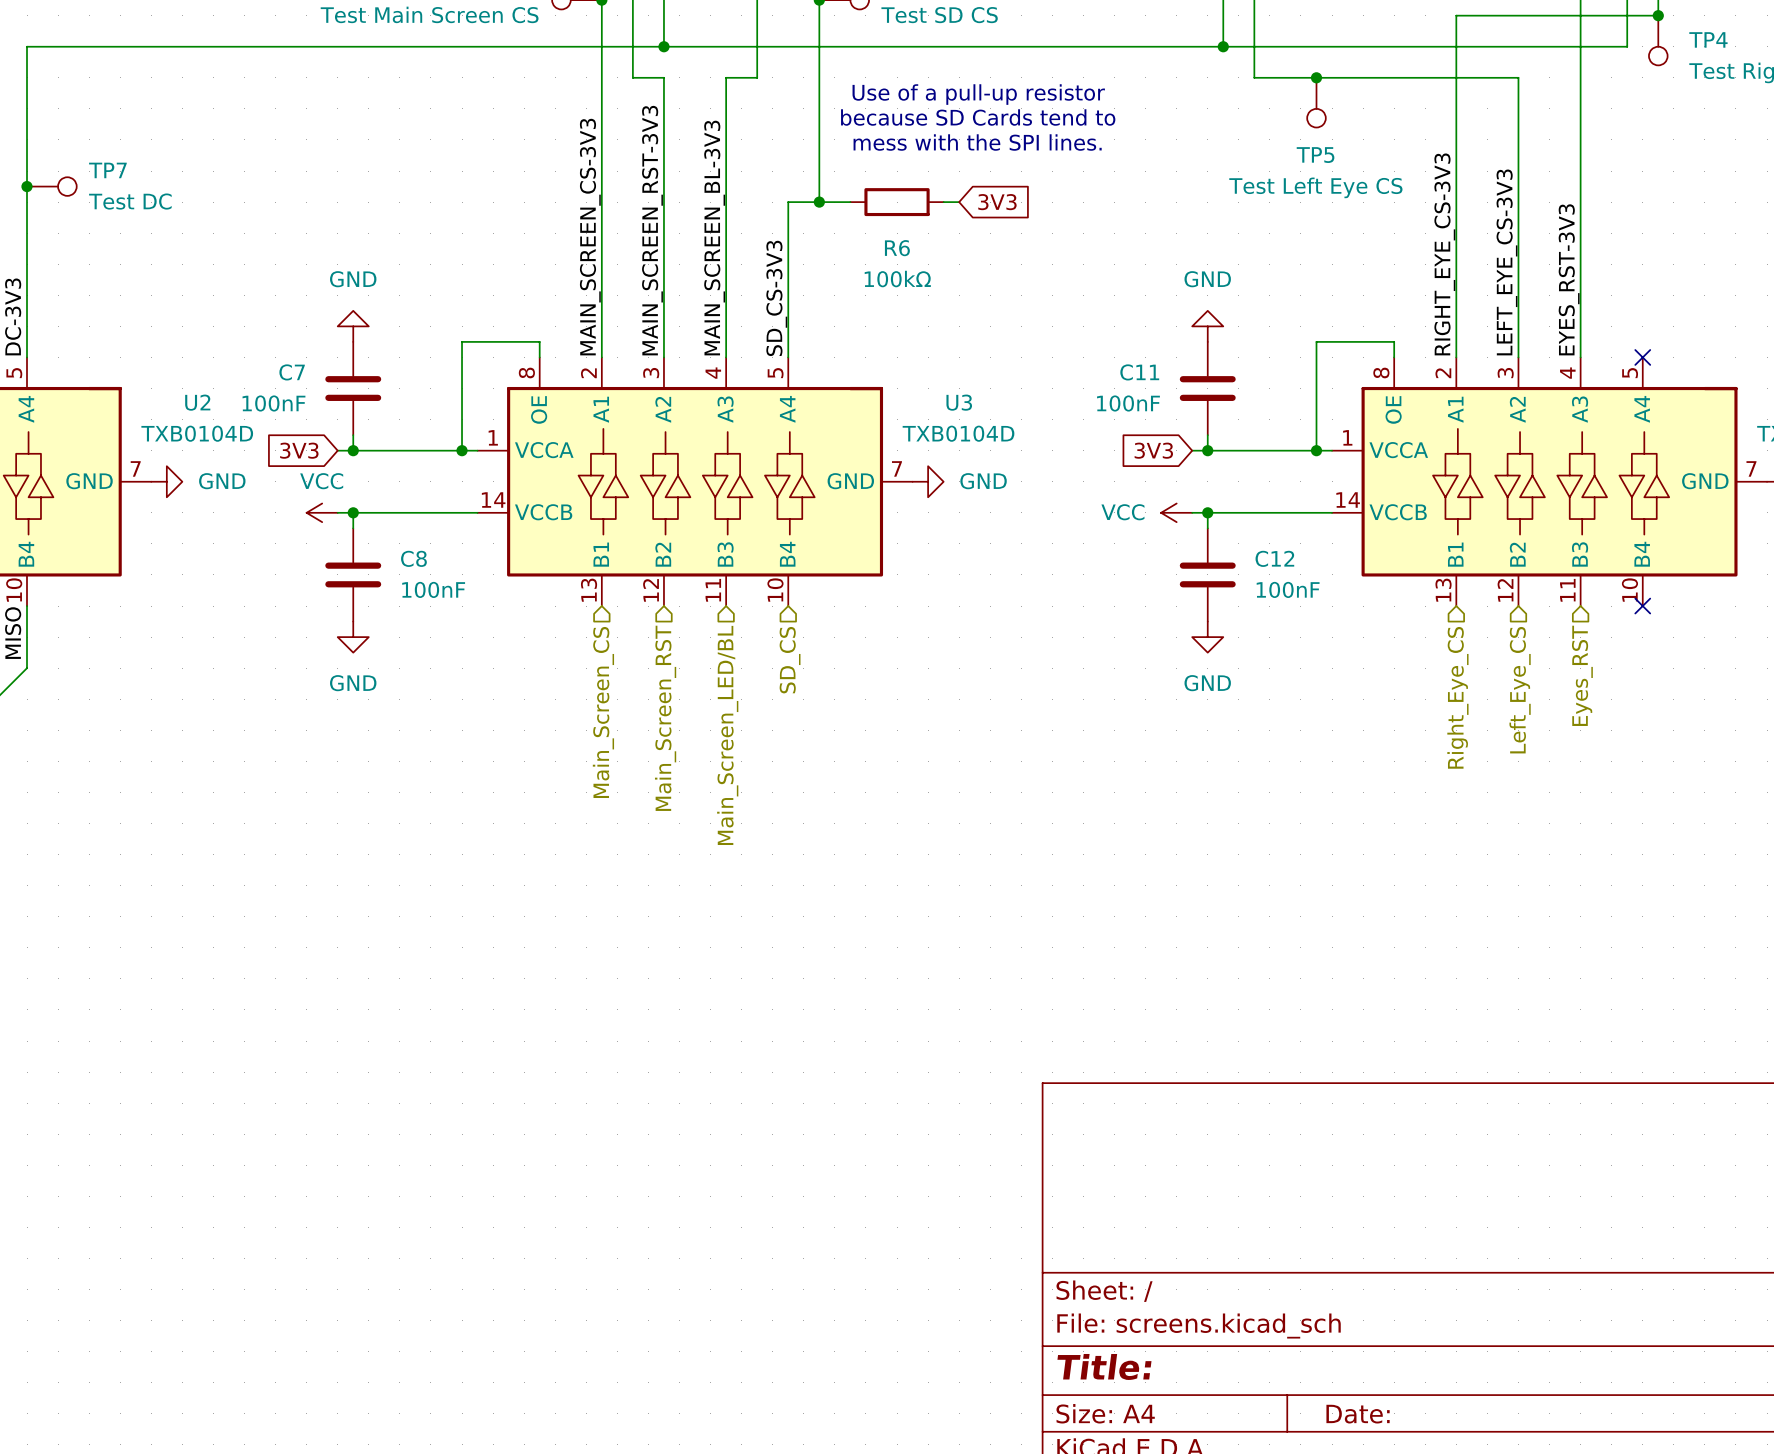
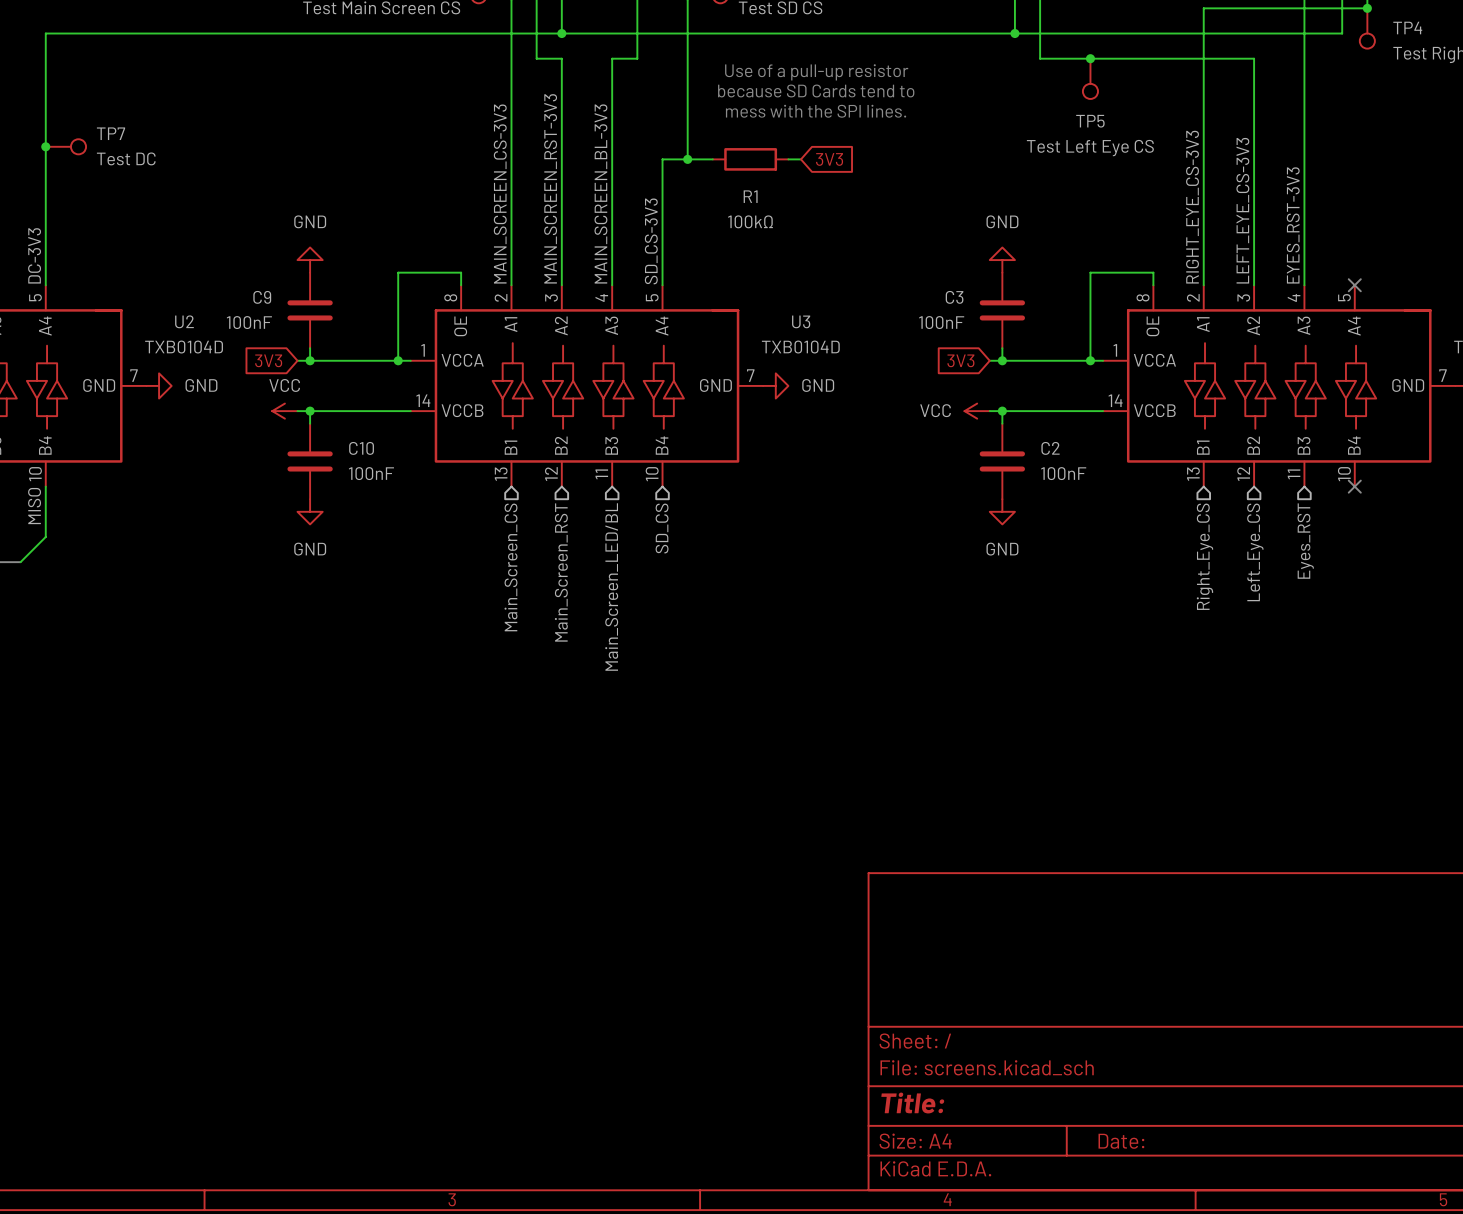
R6 name: R6 (897, 248) -> R1 (750, 196)
C7 name: C7 (292, 372) -> C9 (262, 297)
C11 name: C11 (1139, 372) -> C3 (954, 297)
C8 name: C8 (413, 558) -> C10 (361, 448)
C12 name: C12 (1274, 558) -> C2 (1050, 448)

